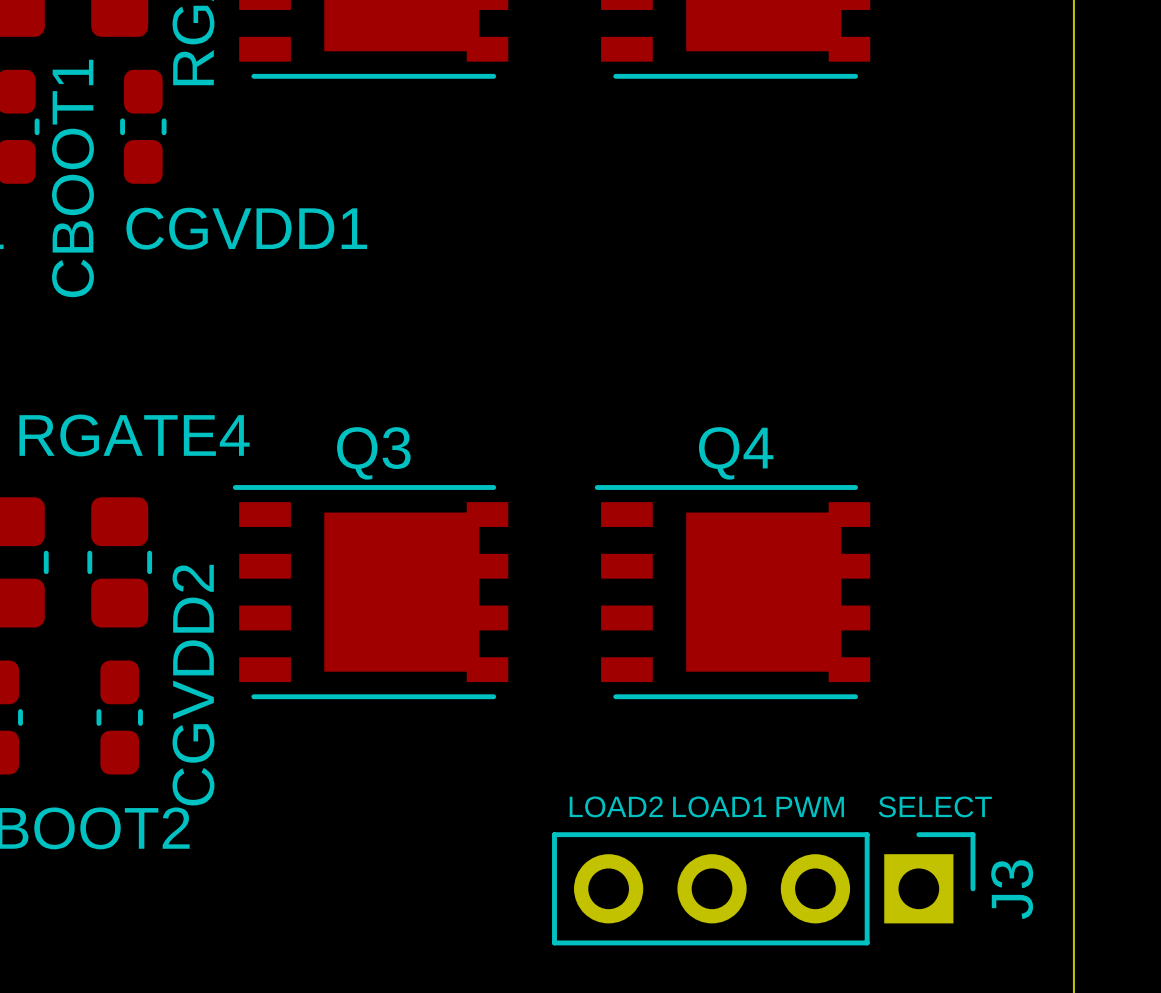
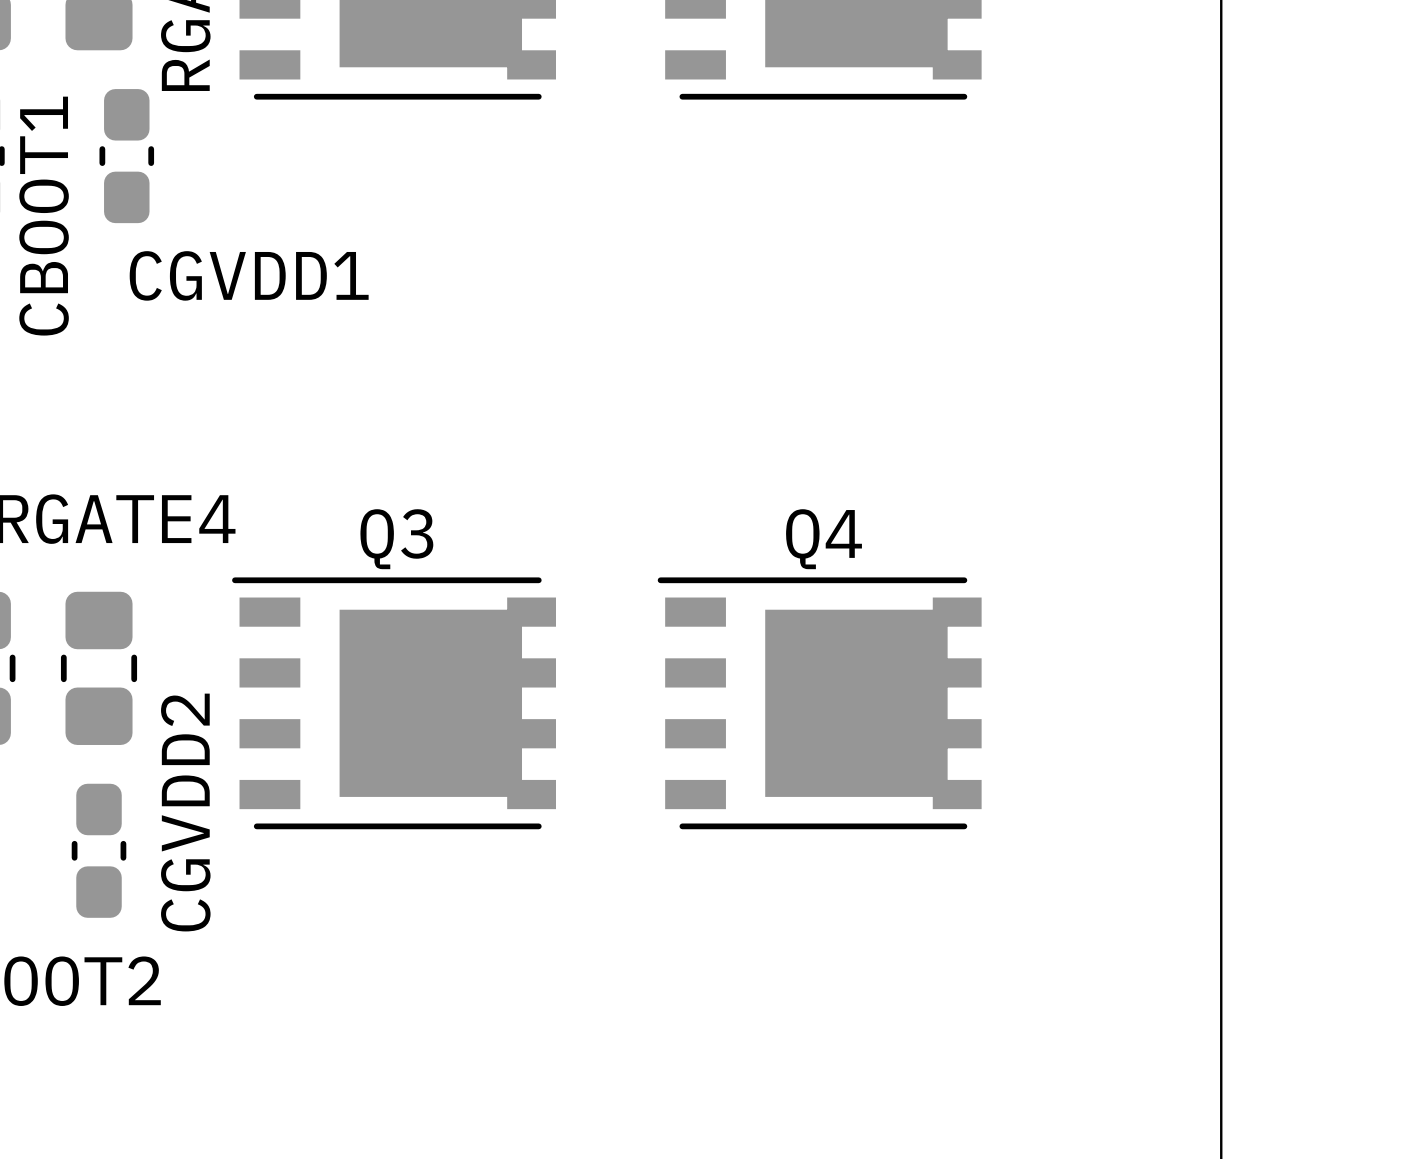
text: LOAD2 (616, 806) -> none
text: LOAD1 (719, 806) -> none
text: PWM (810, 806) -> none
text: SELECT (935, 806) -> none
J3: (763, 888) -> none

